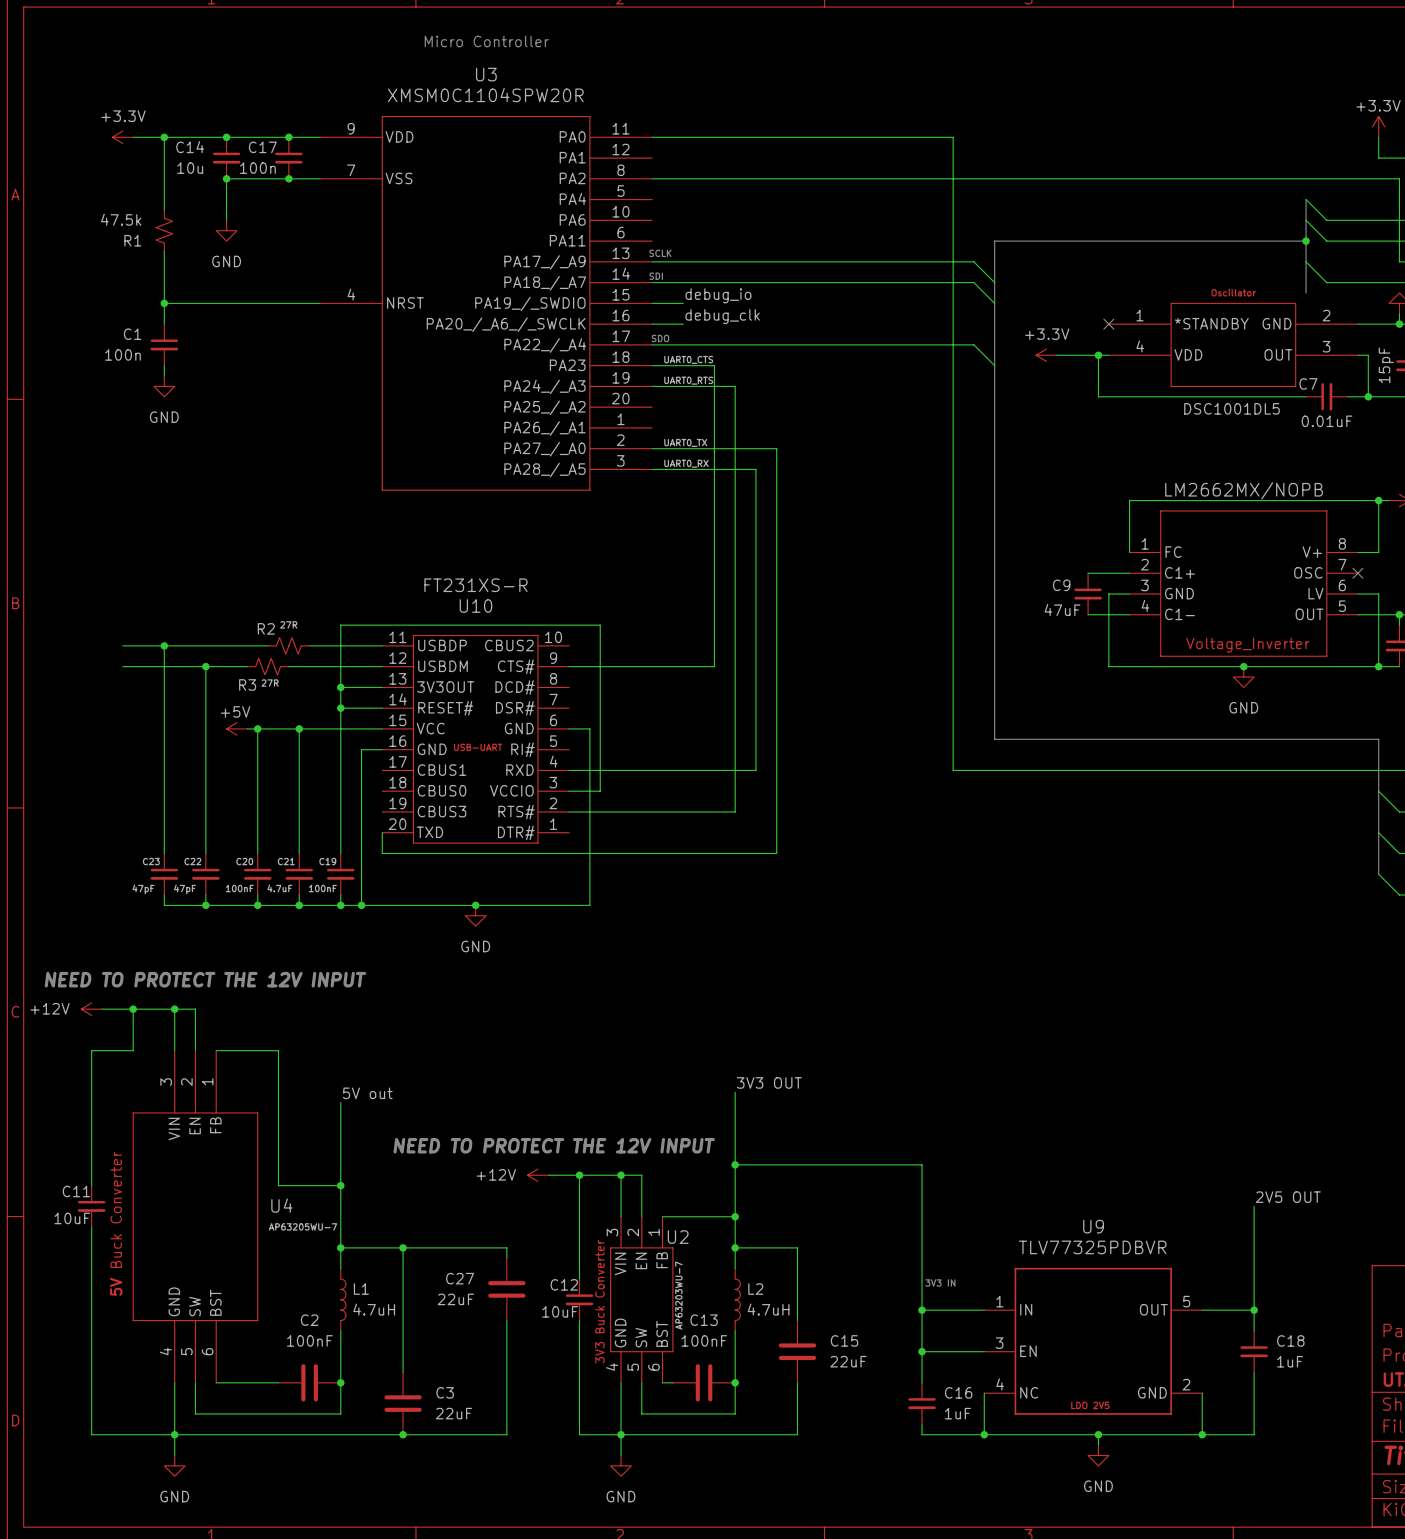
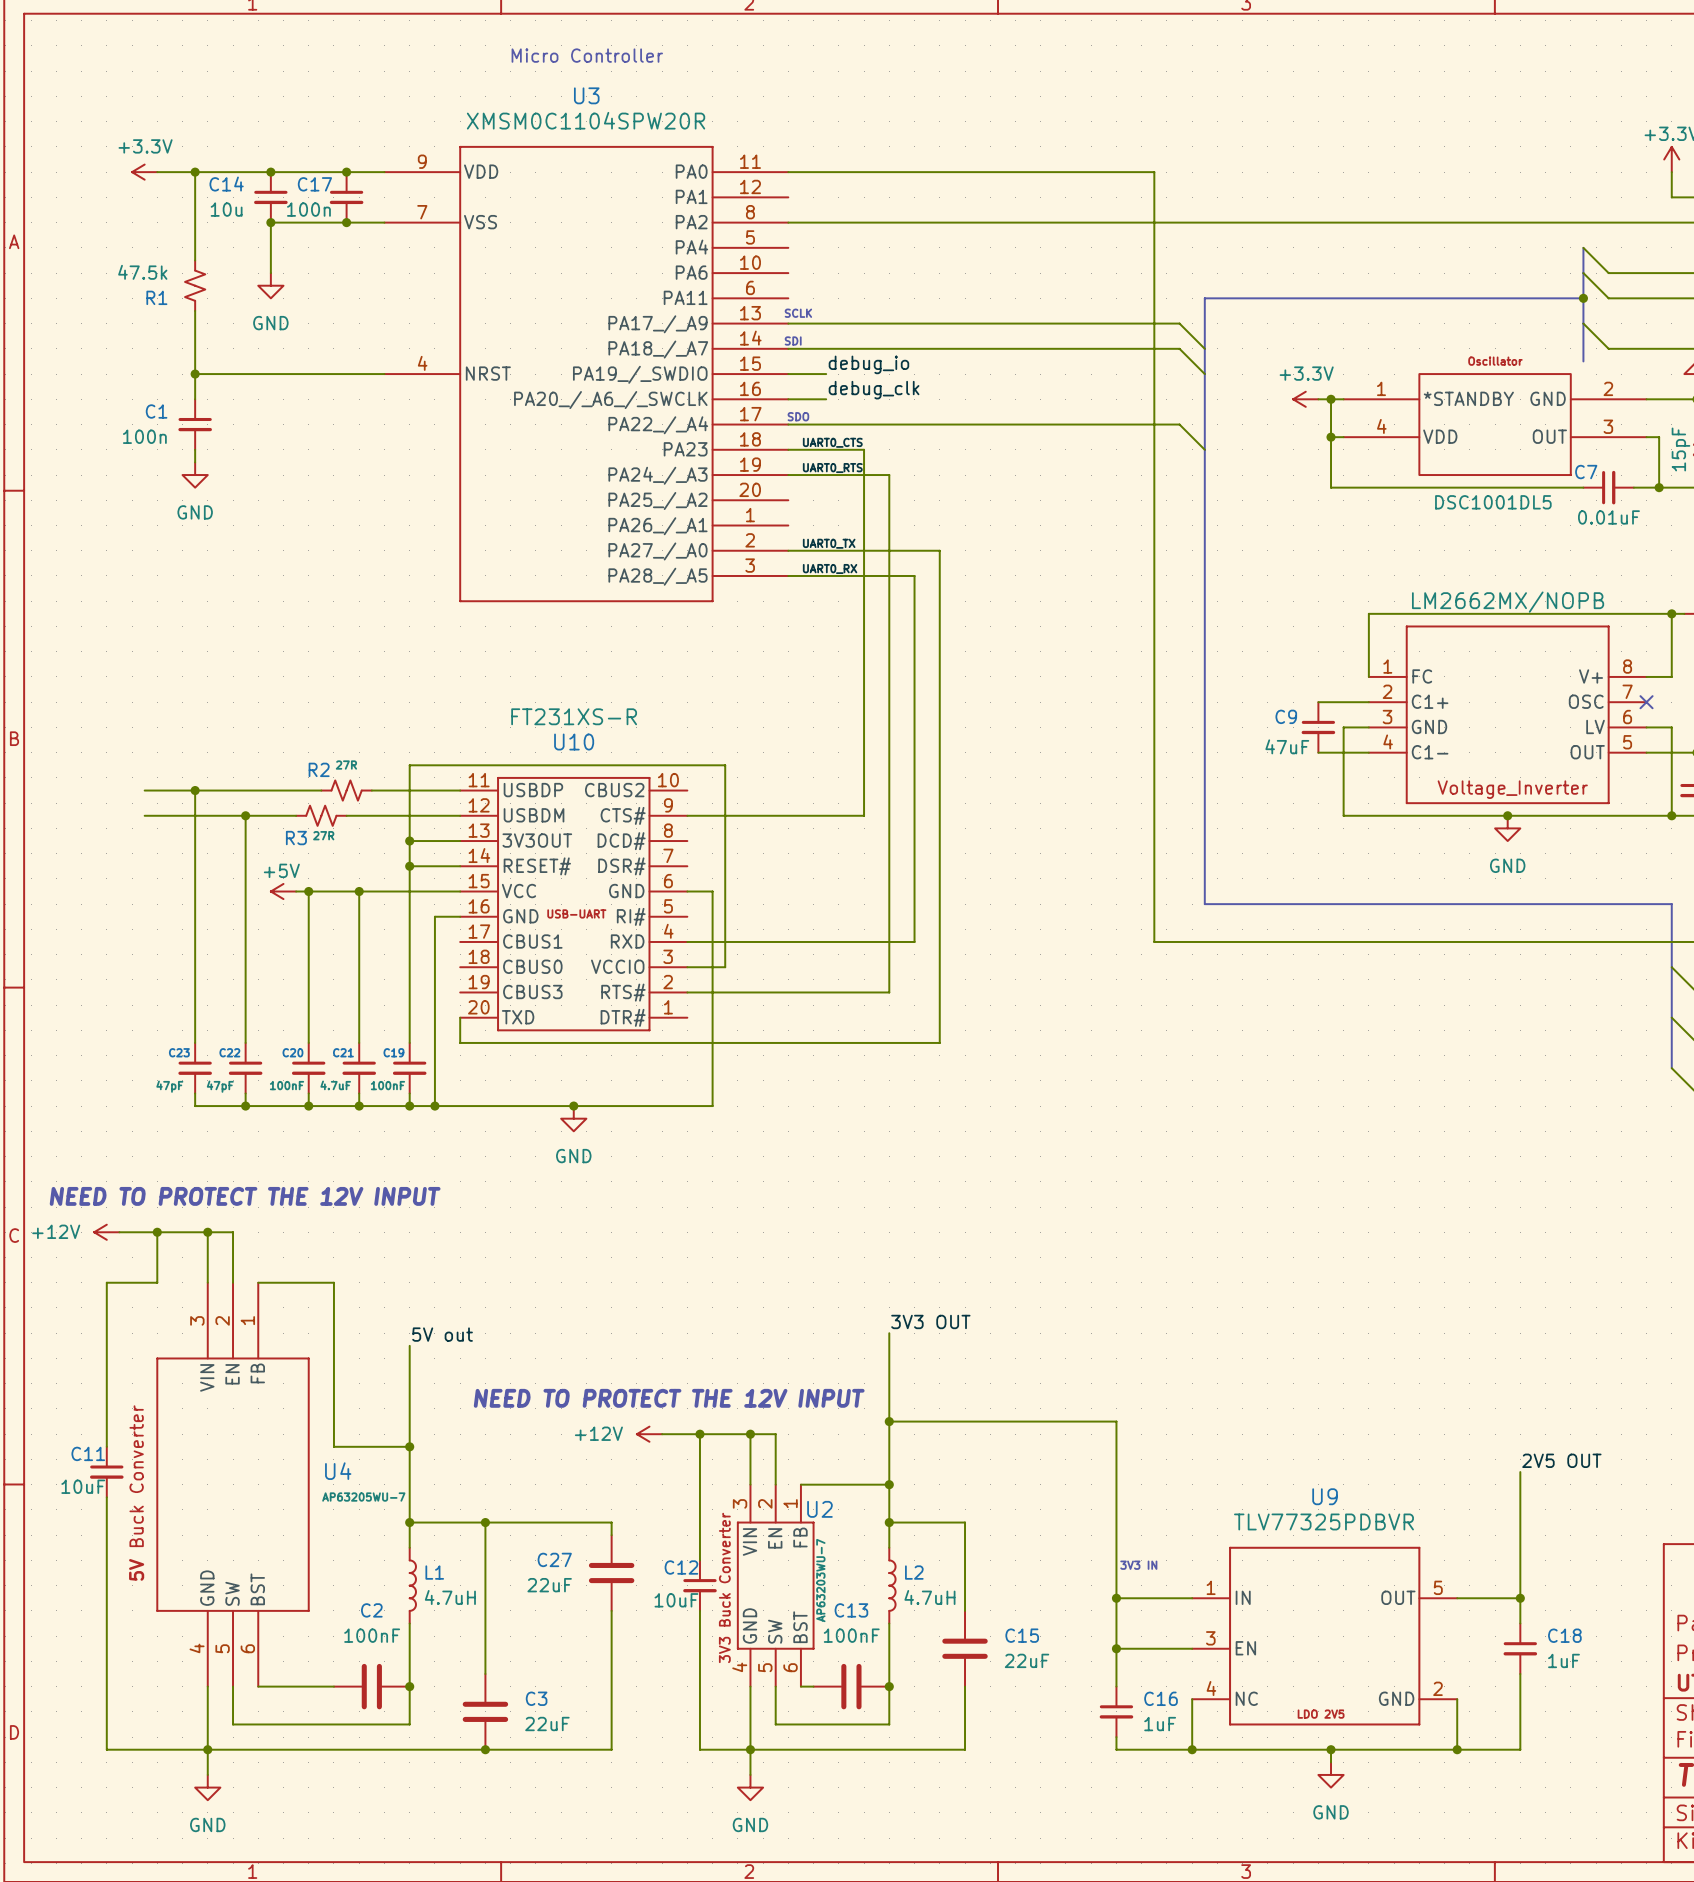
wire: none -> (1318, 399) (1343, 399)
junction: none -> (1331, 399)
no-connect mark: (1108, 324) -> none
power symbol position: +3.3V (1046, 355) -> +3.3V (1305, 399)
wire: (1056, 355) (1098, 355) -> (1331, 399) (1331, 437)

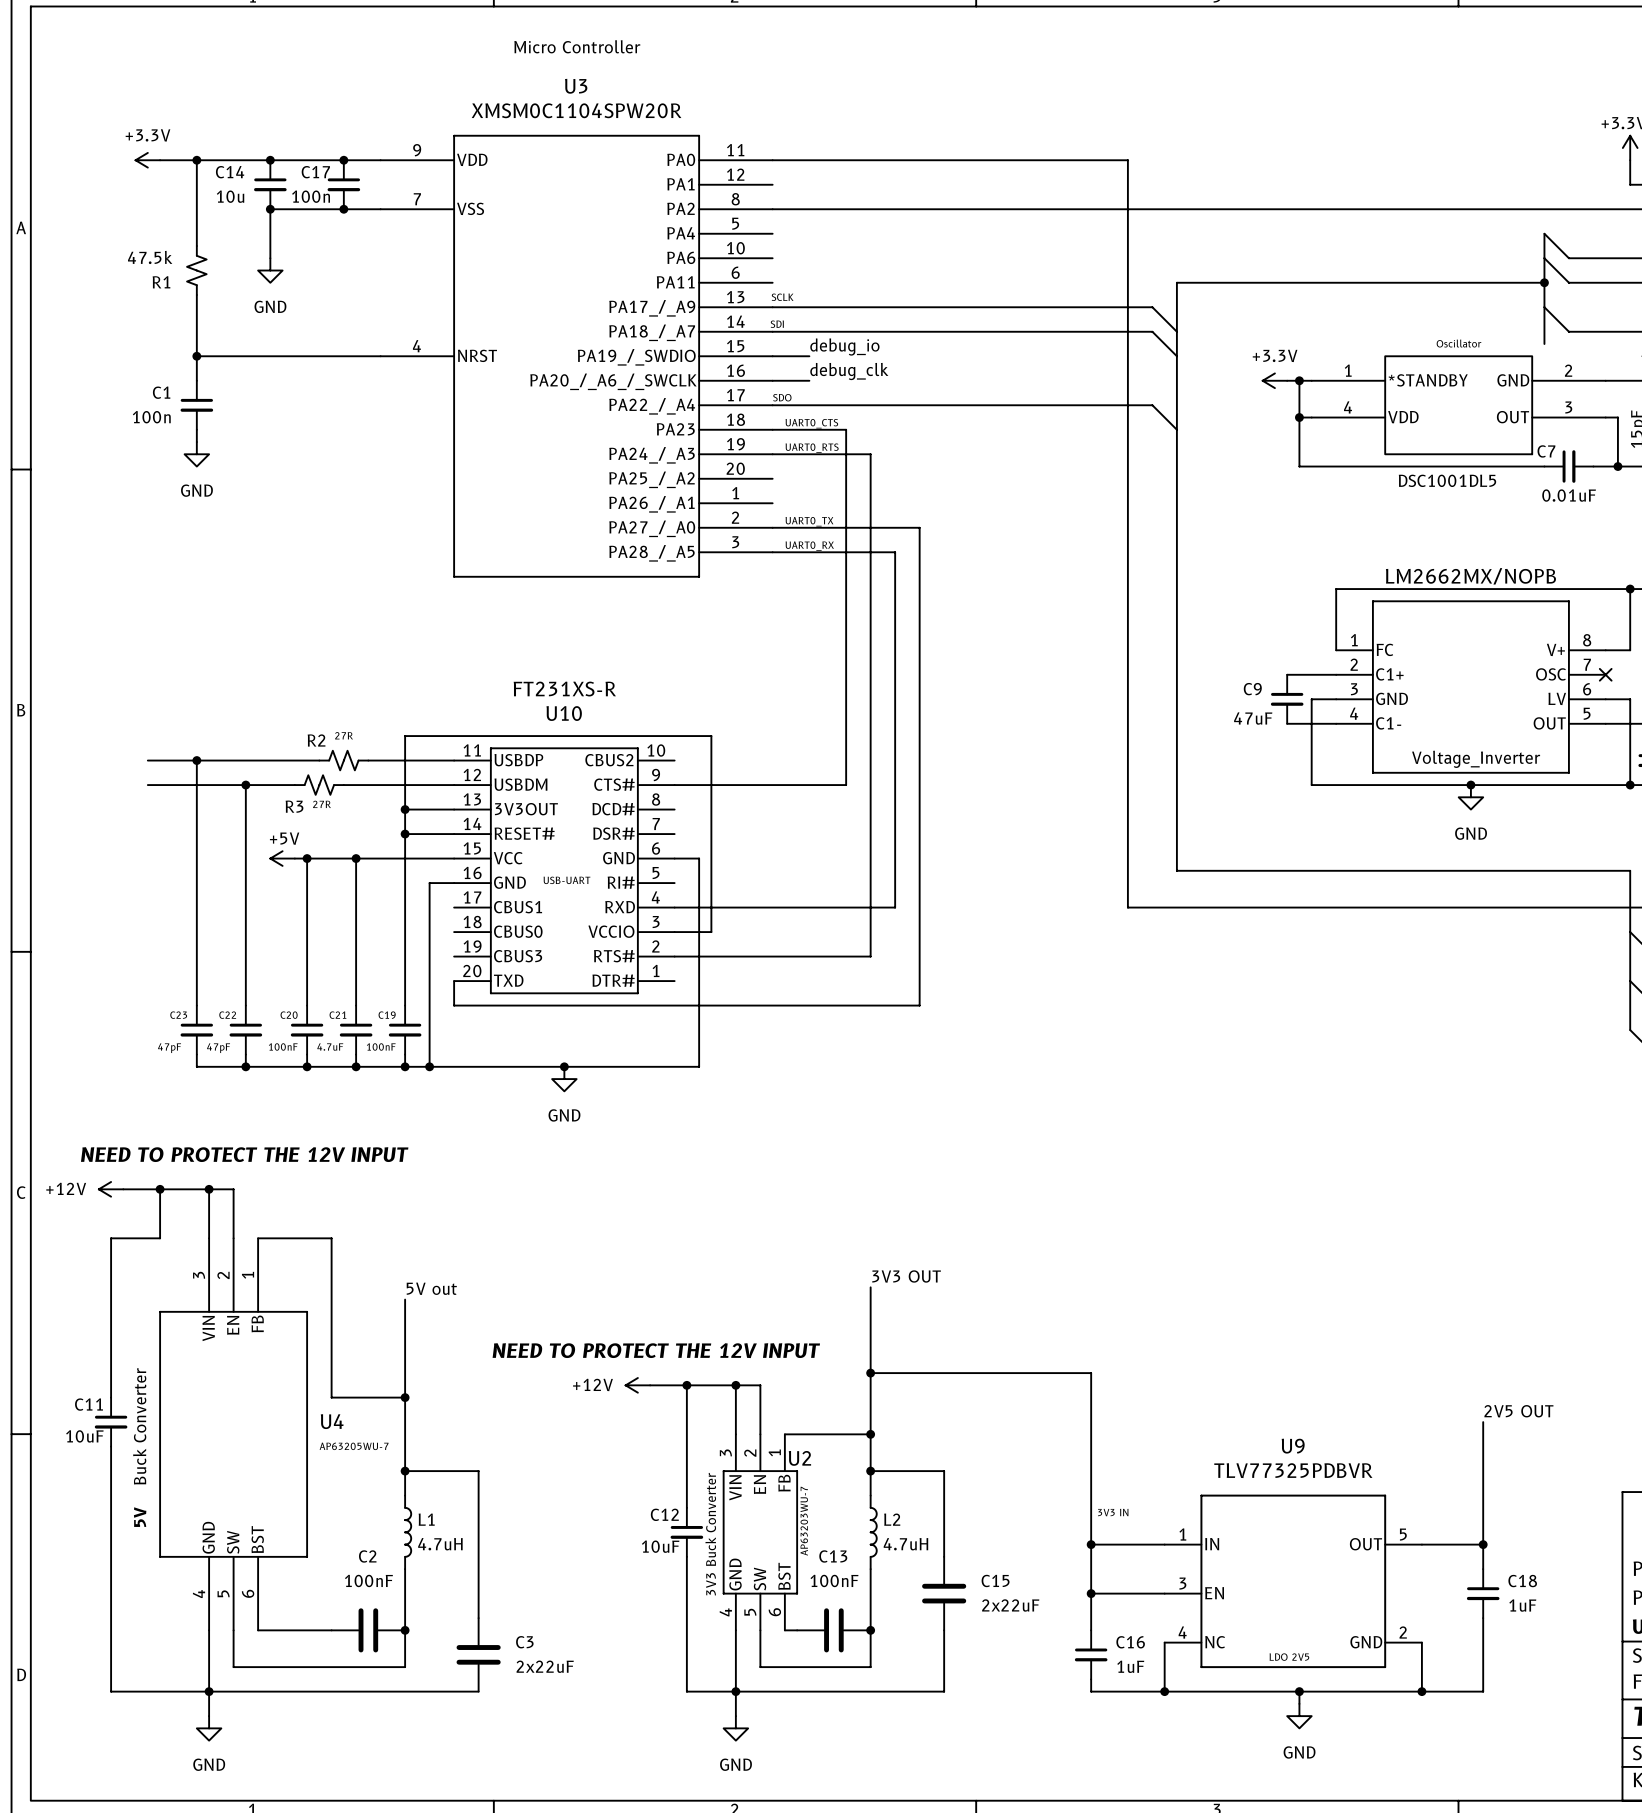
wire: (485, 1522) (611, 1522) (611, 1535) -> none
junction: (485, 1522) -> none
C27: 22uF (611, 1573) -> none
wire: (611, 1610) (611, 1749) (485, 1749) -> none
C15 value: 22uF (1027, 1660) -> 2x22uF (1010, 1605)
C3 value: 22uF (547, 1724) -> 2x22uF (545, 1666)
junction: (485, 1749) -> none

